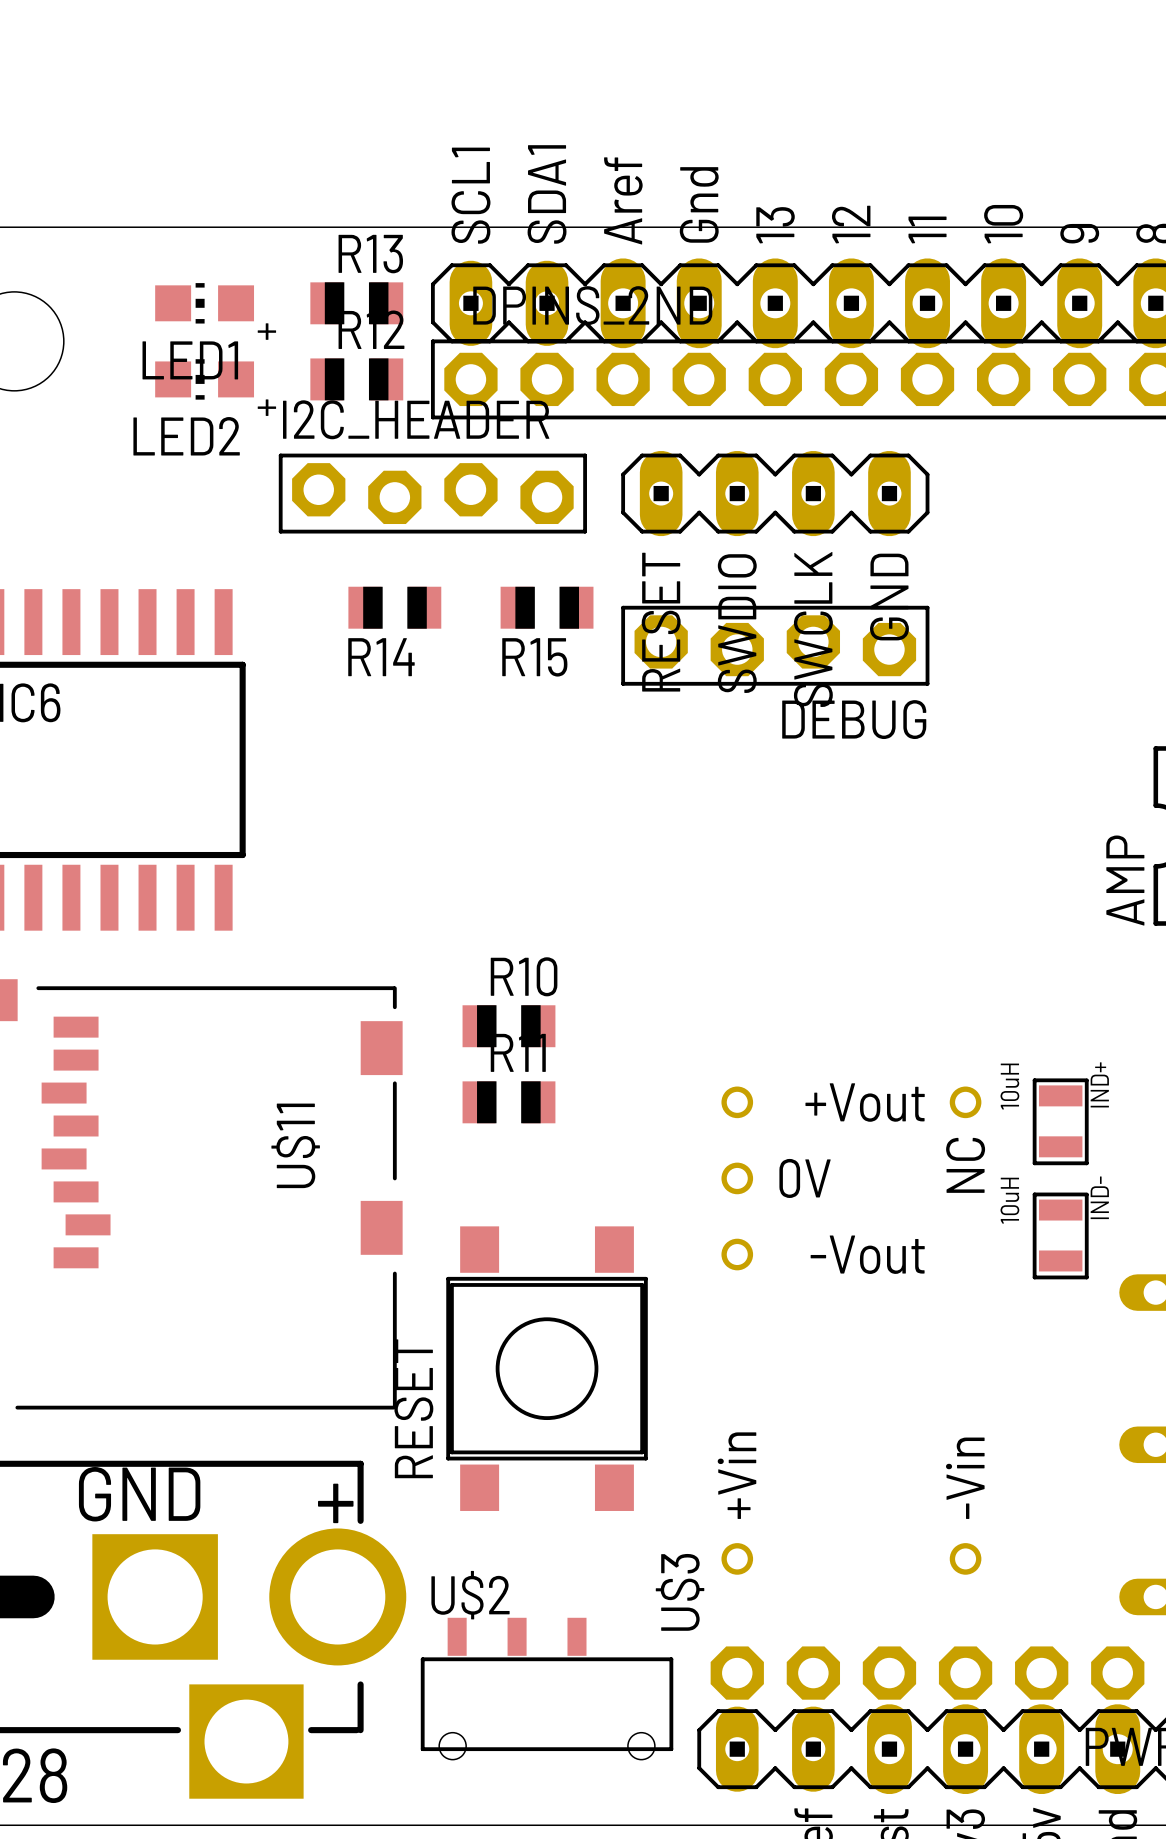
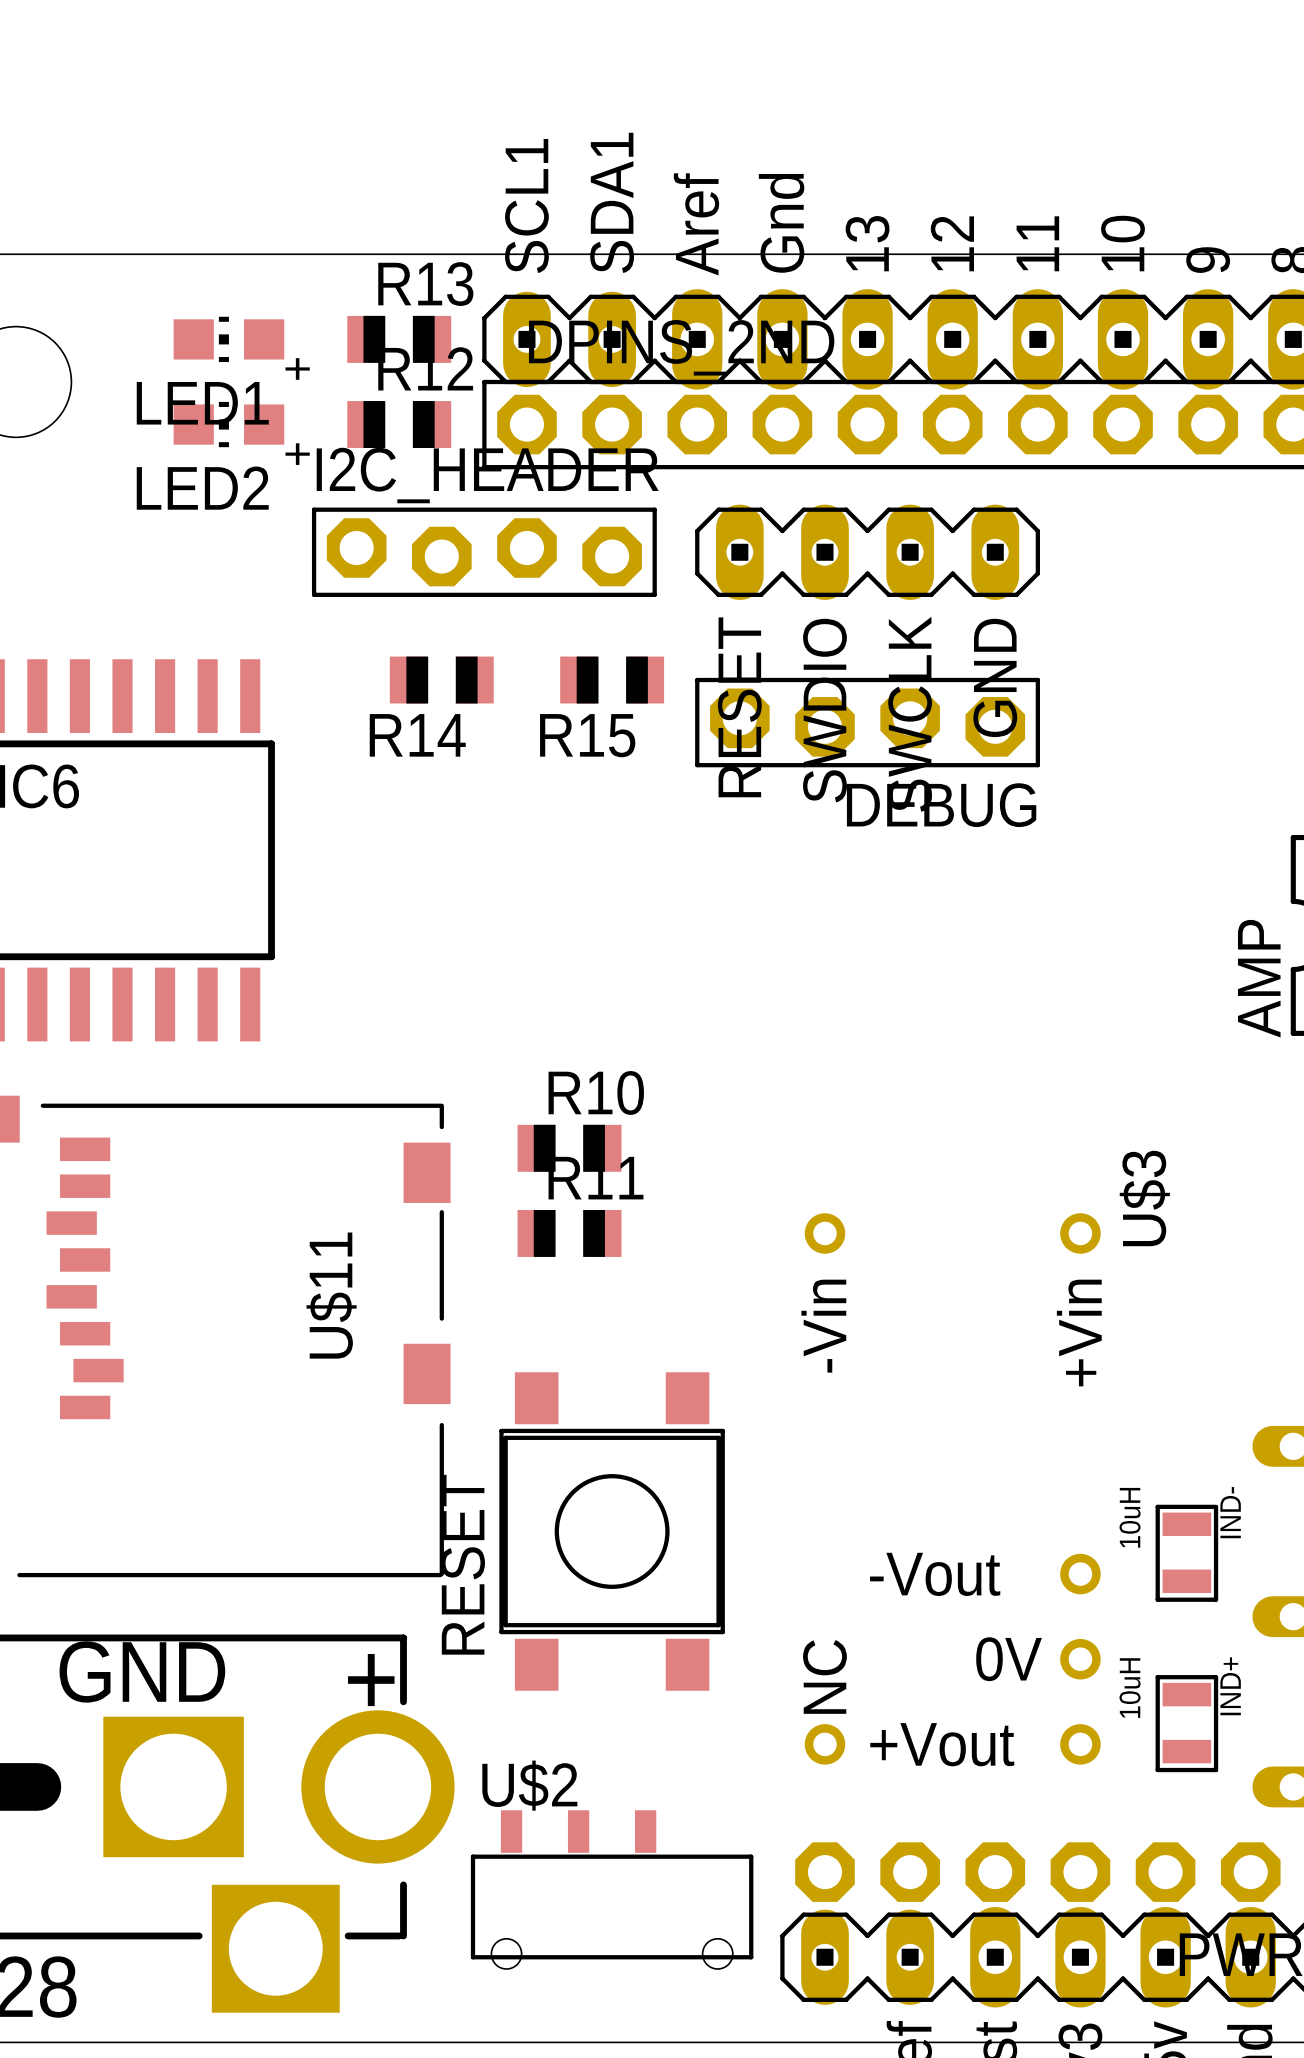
U$3 footprint: [721, 1086, 982, 1575] -> [804, 1213, 1101, 1765]
IND+ position: (1060, 1121) -> (1186, 1723)
IND- position: (1060, 1235) -> (1186, 1553)
U$3 name position: U$3 (680, 1592) -> U$3 (1144, 1198)

